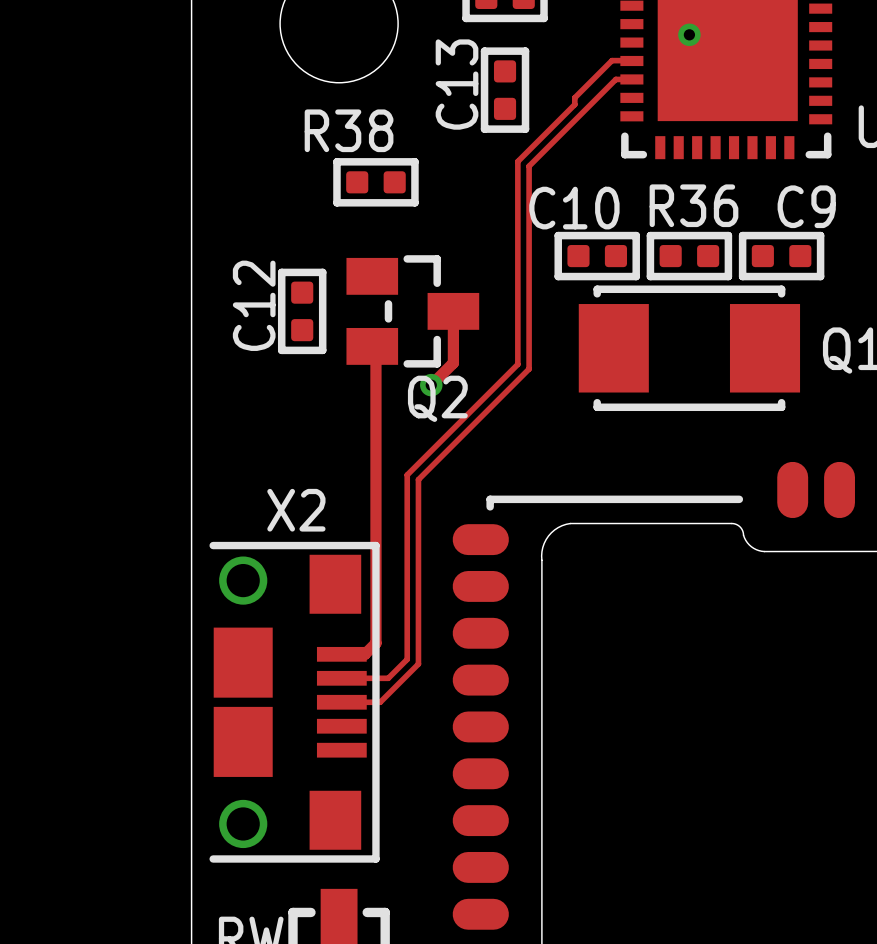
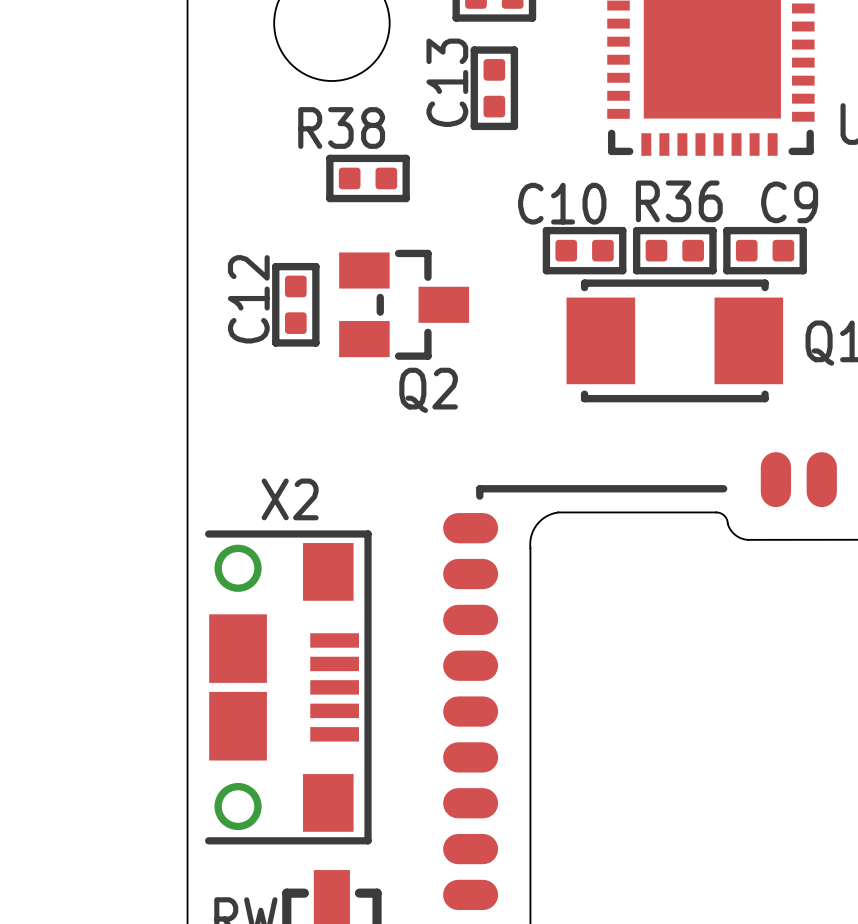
via: (689, 34) -> none
track: (631, 60) (611, 60) (574, 97) (574, 104) (517, 161) (517, 364) (407, 475) (407, 659) (388, 678) (341, 678) -> none
track: (631, 79) (615, 79) (529, 166) (529, 369) (418, 479) (418, 664) (380, 702) (341, 702) -> none
track: (453, 311) (453, 363) (431, 385) -> none
track: (372, 346) (375, 350) (375, 643) (364, 654) (341, 654) -> none
via: (431, 385) -> none

